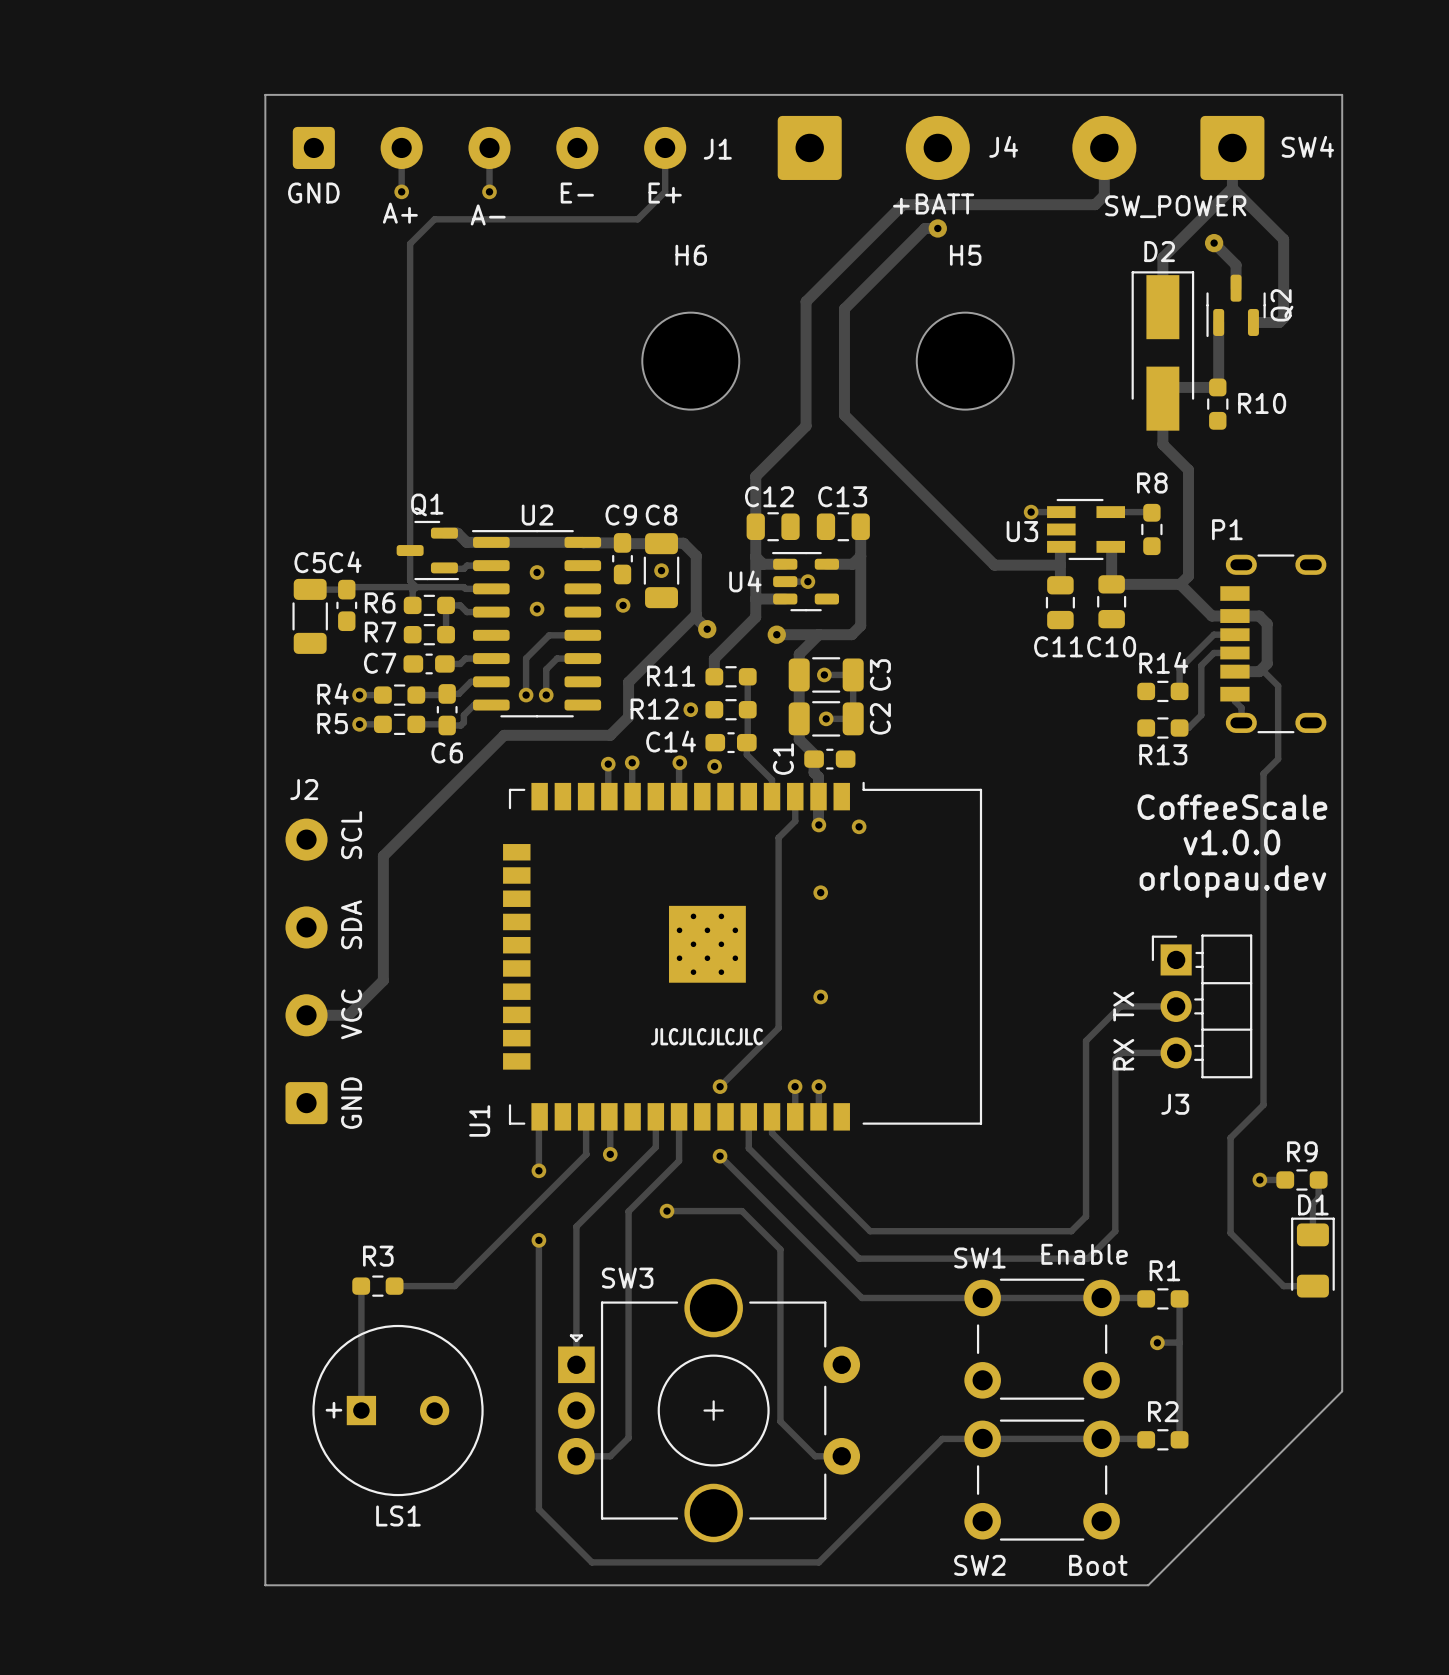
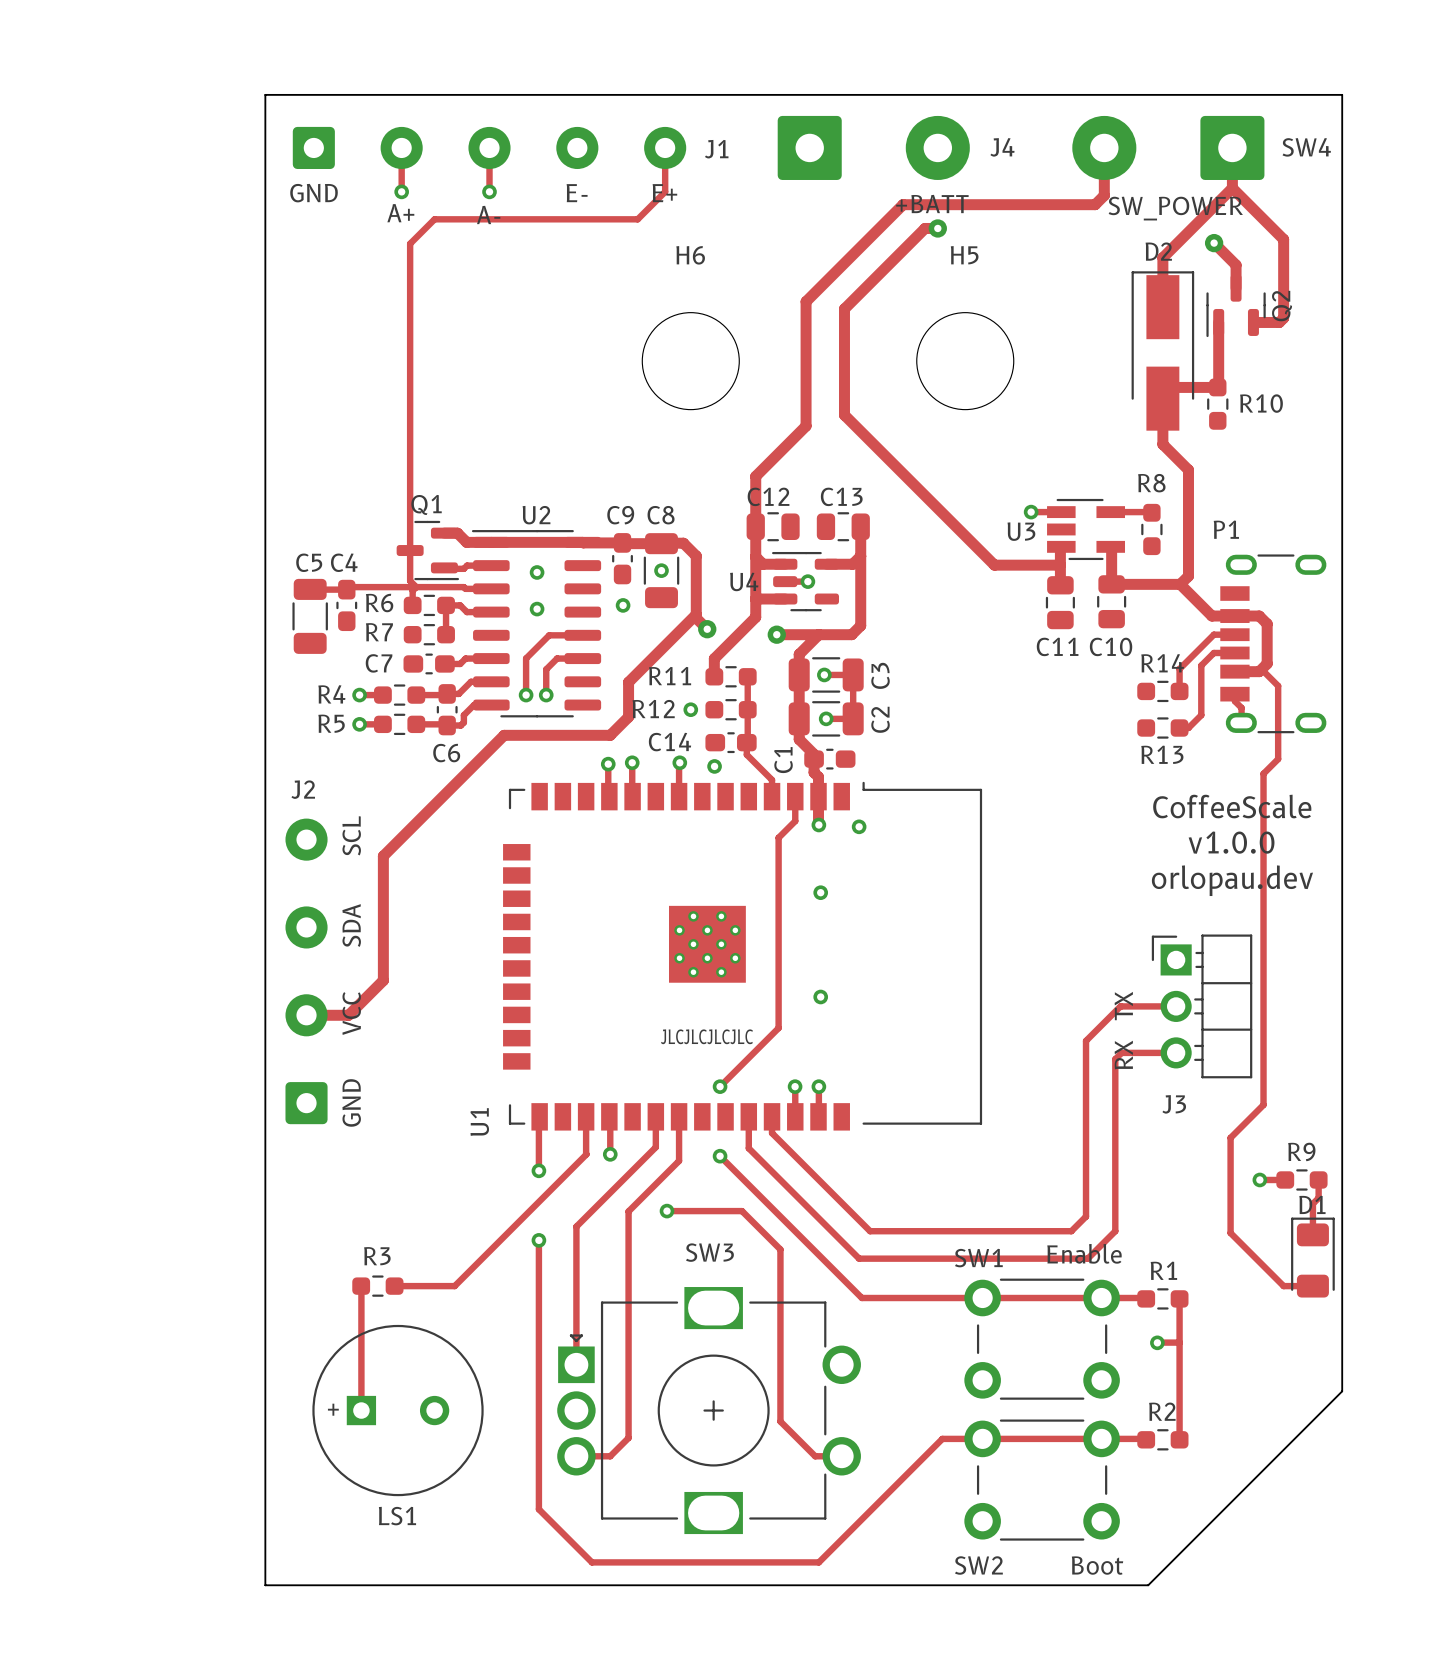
SW3 footprint: [558, 1278, 861, 1543] -> [557, 1287, 861, 1535]
SW3 name position: SW3 (627, 1278) -> SW3 (709, 1252)

